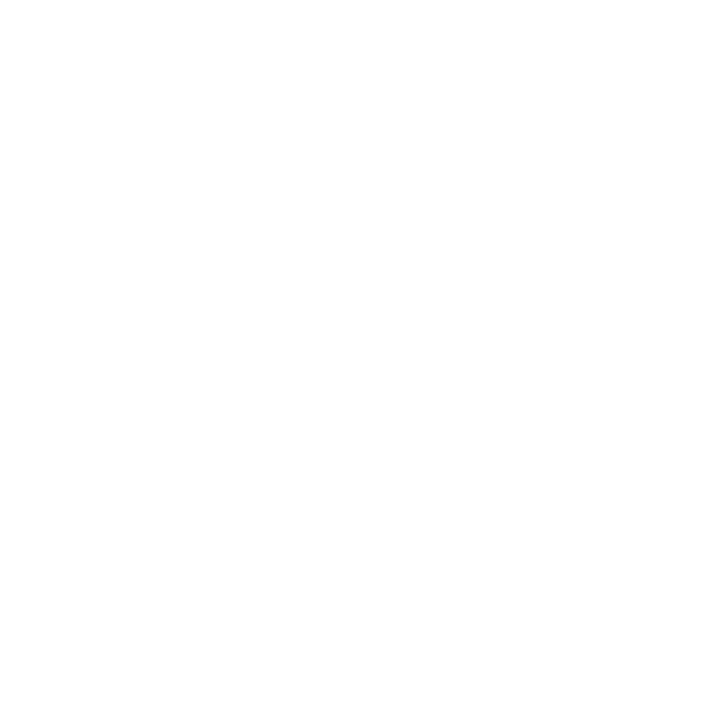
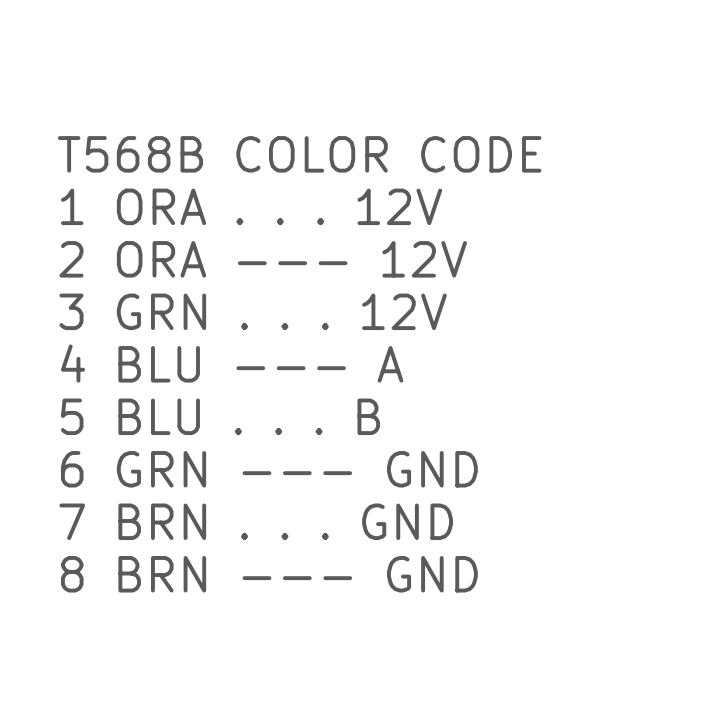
text: none -> T568B COLOR CODE (299, 154)
text: none -> 1 ORA . . . 12V (251, 206)
text: none -> 2 ORA --- 12V (263, 259)
text: none -> 3 GRN . . . 12V (253, 311)
text: none -> 4 BLU --- A (232, 363)
text: none -> 5 BLU . . . B (220, 416)
text: none -> 6 GRN --- GND (269, 469)
text: none -> 7 BRN . . . GND (256, 521)
text: none -> 8 BRN --- GND (269, 574)

